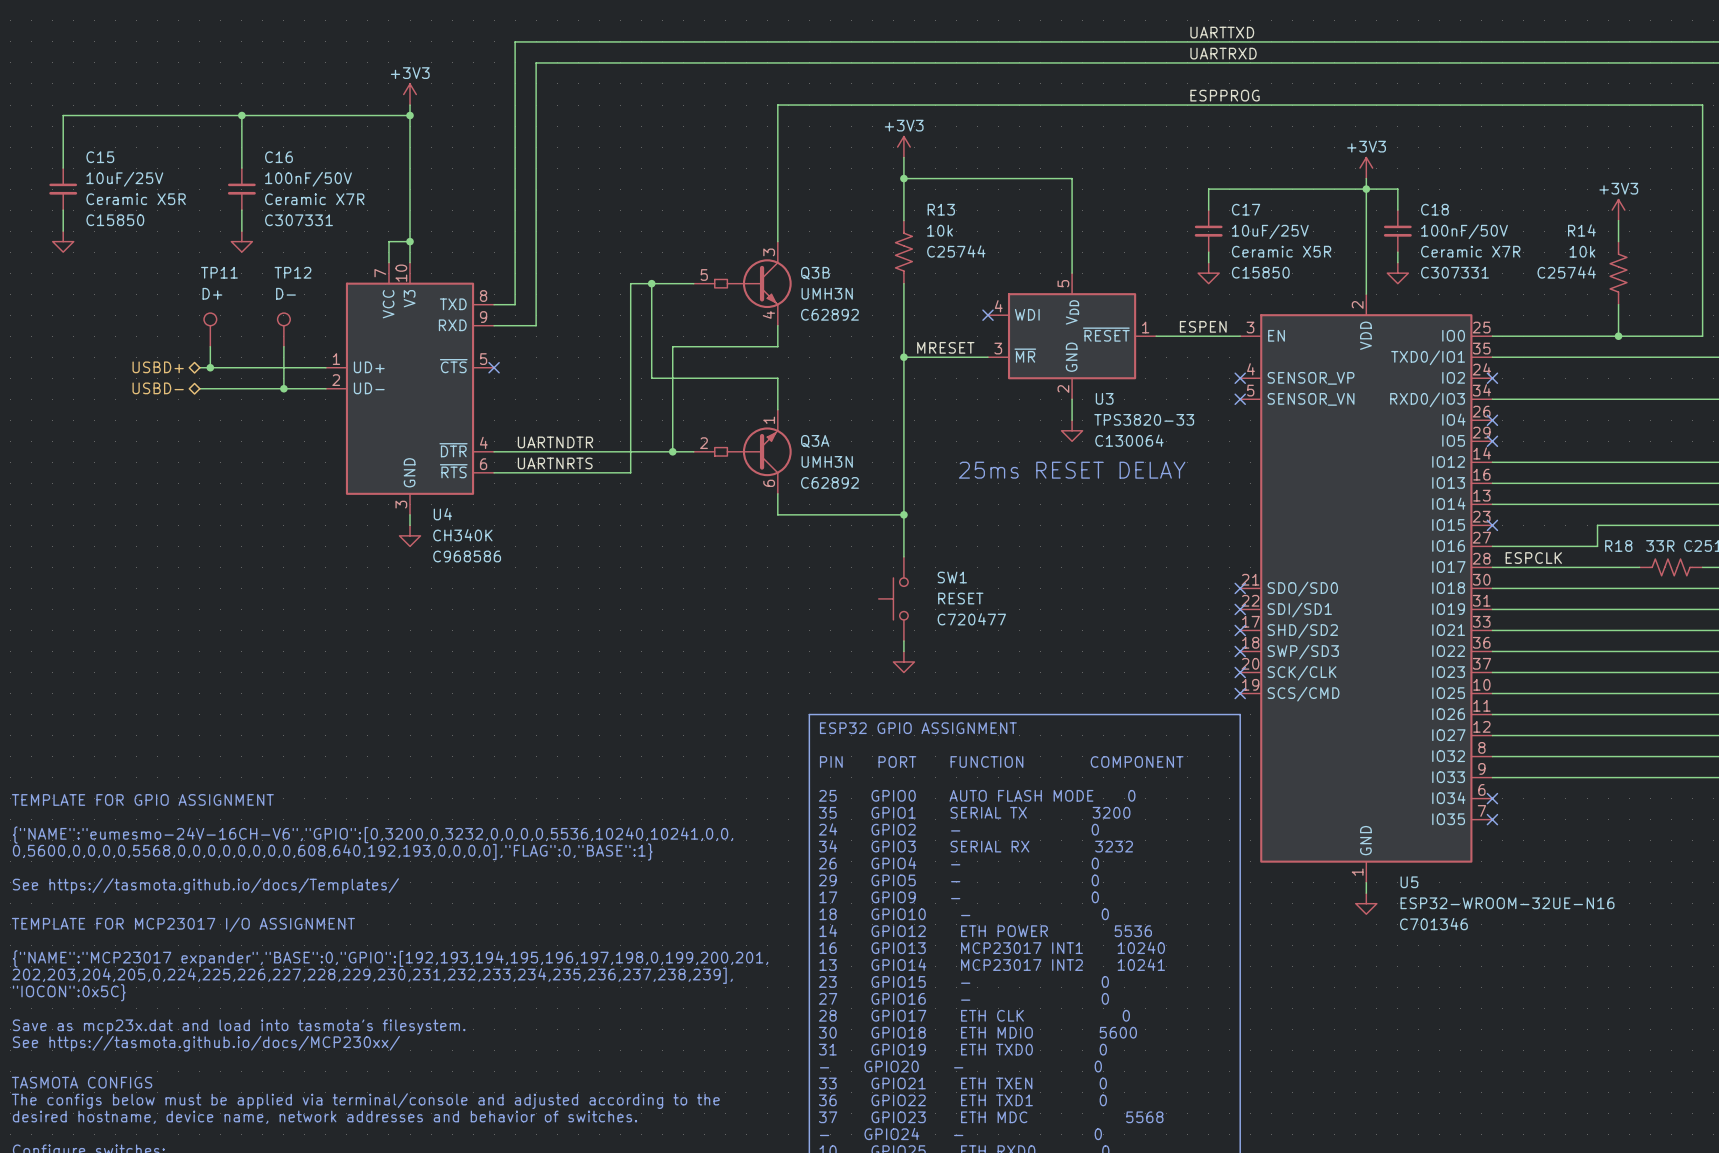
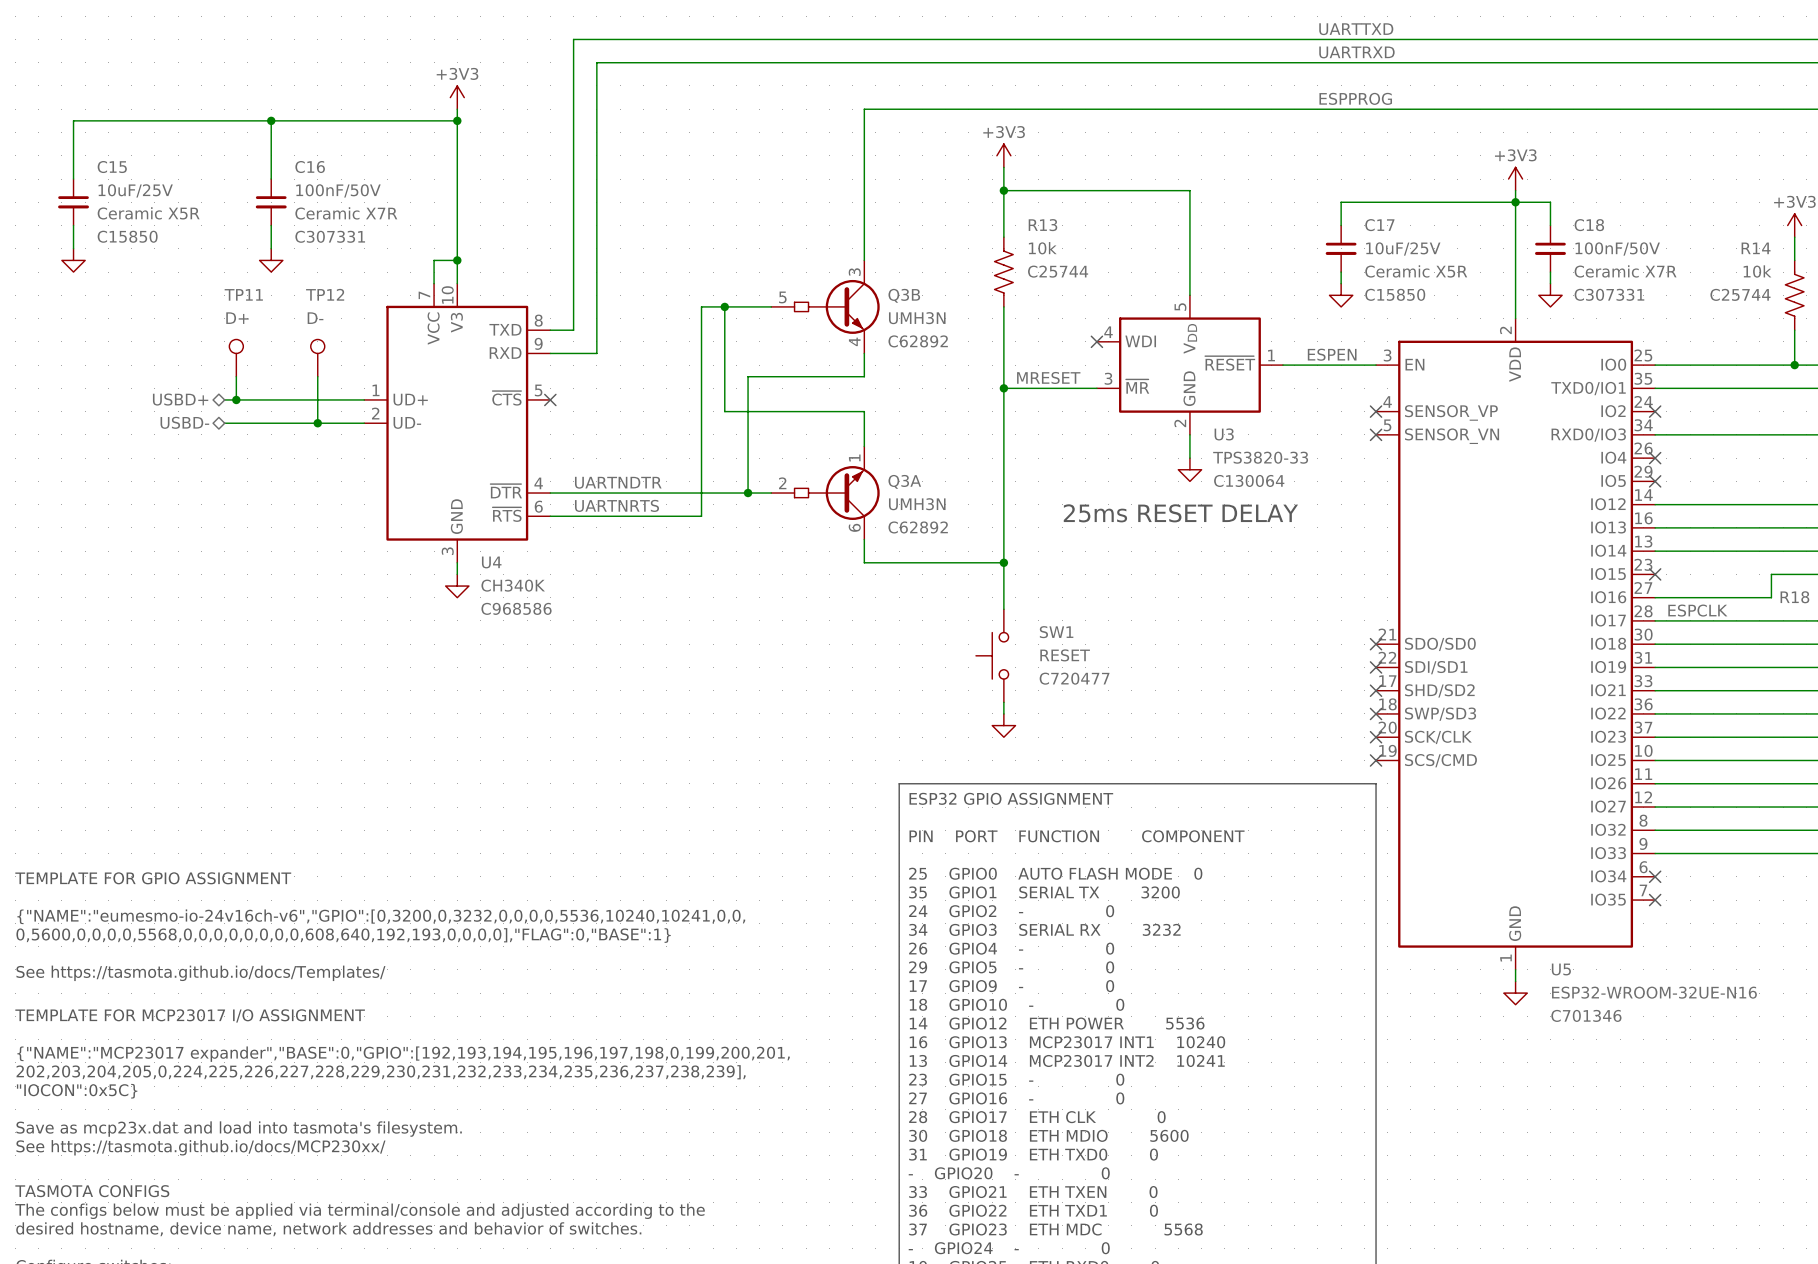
text: {"NAME":"eumesmo-24V-16CH-V6","GPIO":[0,3200,0,3232,0,0,0,0,5536,10240,10241,0,0, (373, 835) -> {"NAME":"eumesmo-io-24v16ch-v6","GPIO":[0,3200,0,3232,0,0,0,0,5536,10240,10241,0,0, (381, 916)

